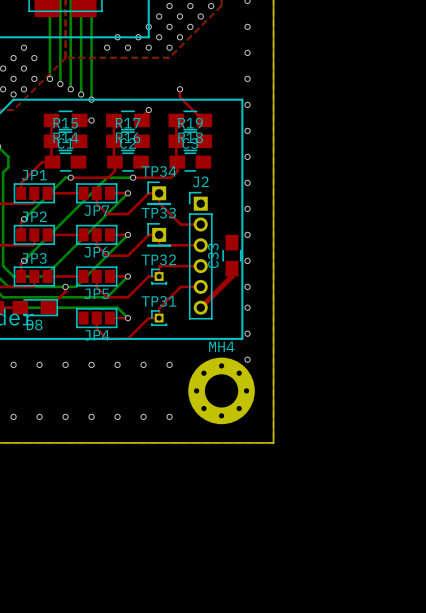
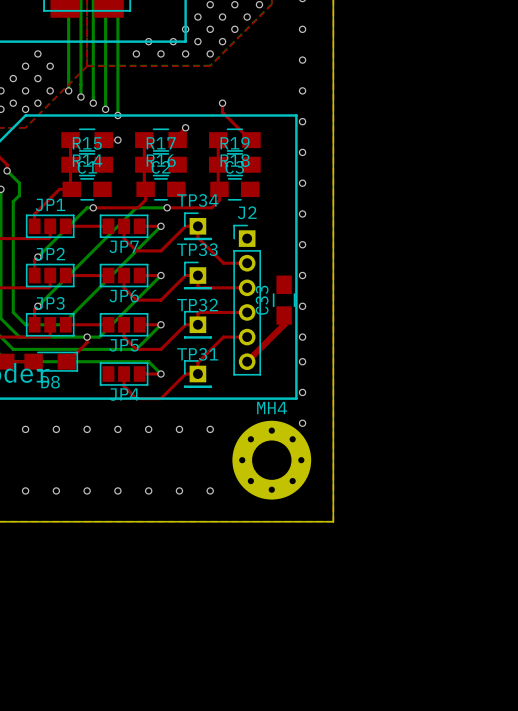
TP32 footprint: [151, 268, 168, 285] -> [184, 310, 212, 339]
TP31 footprint: [151, 310, 168, 326] -> [184, 360, 212, 388]

